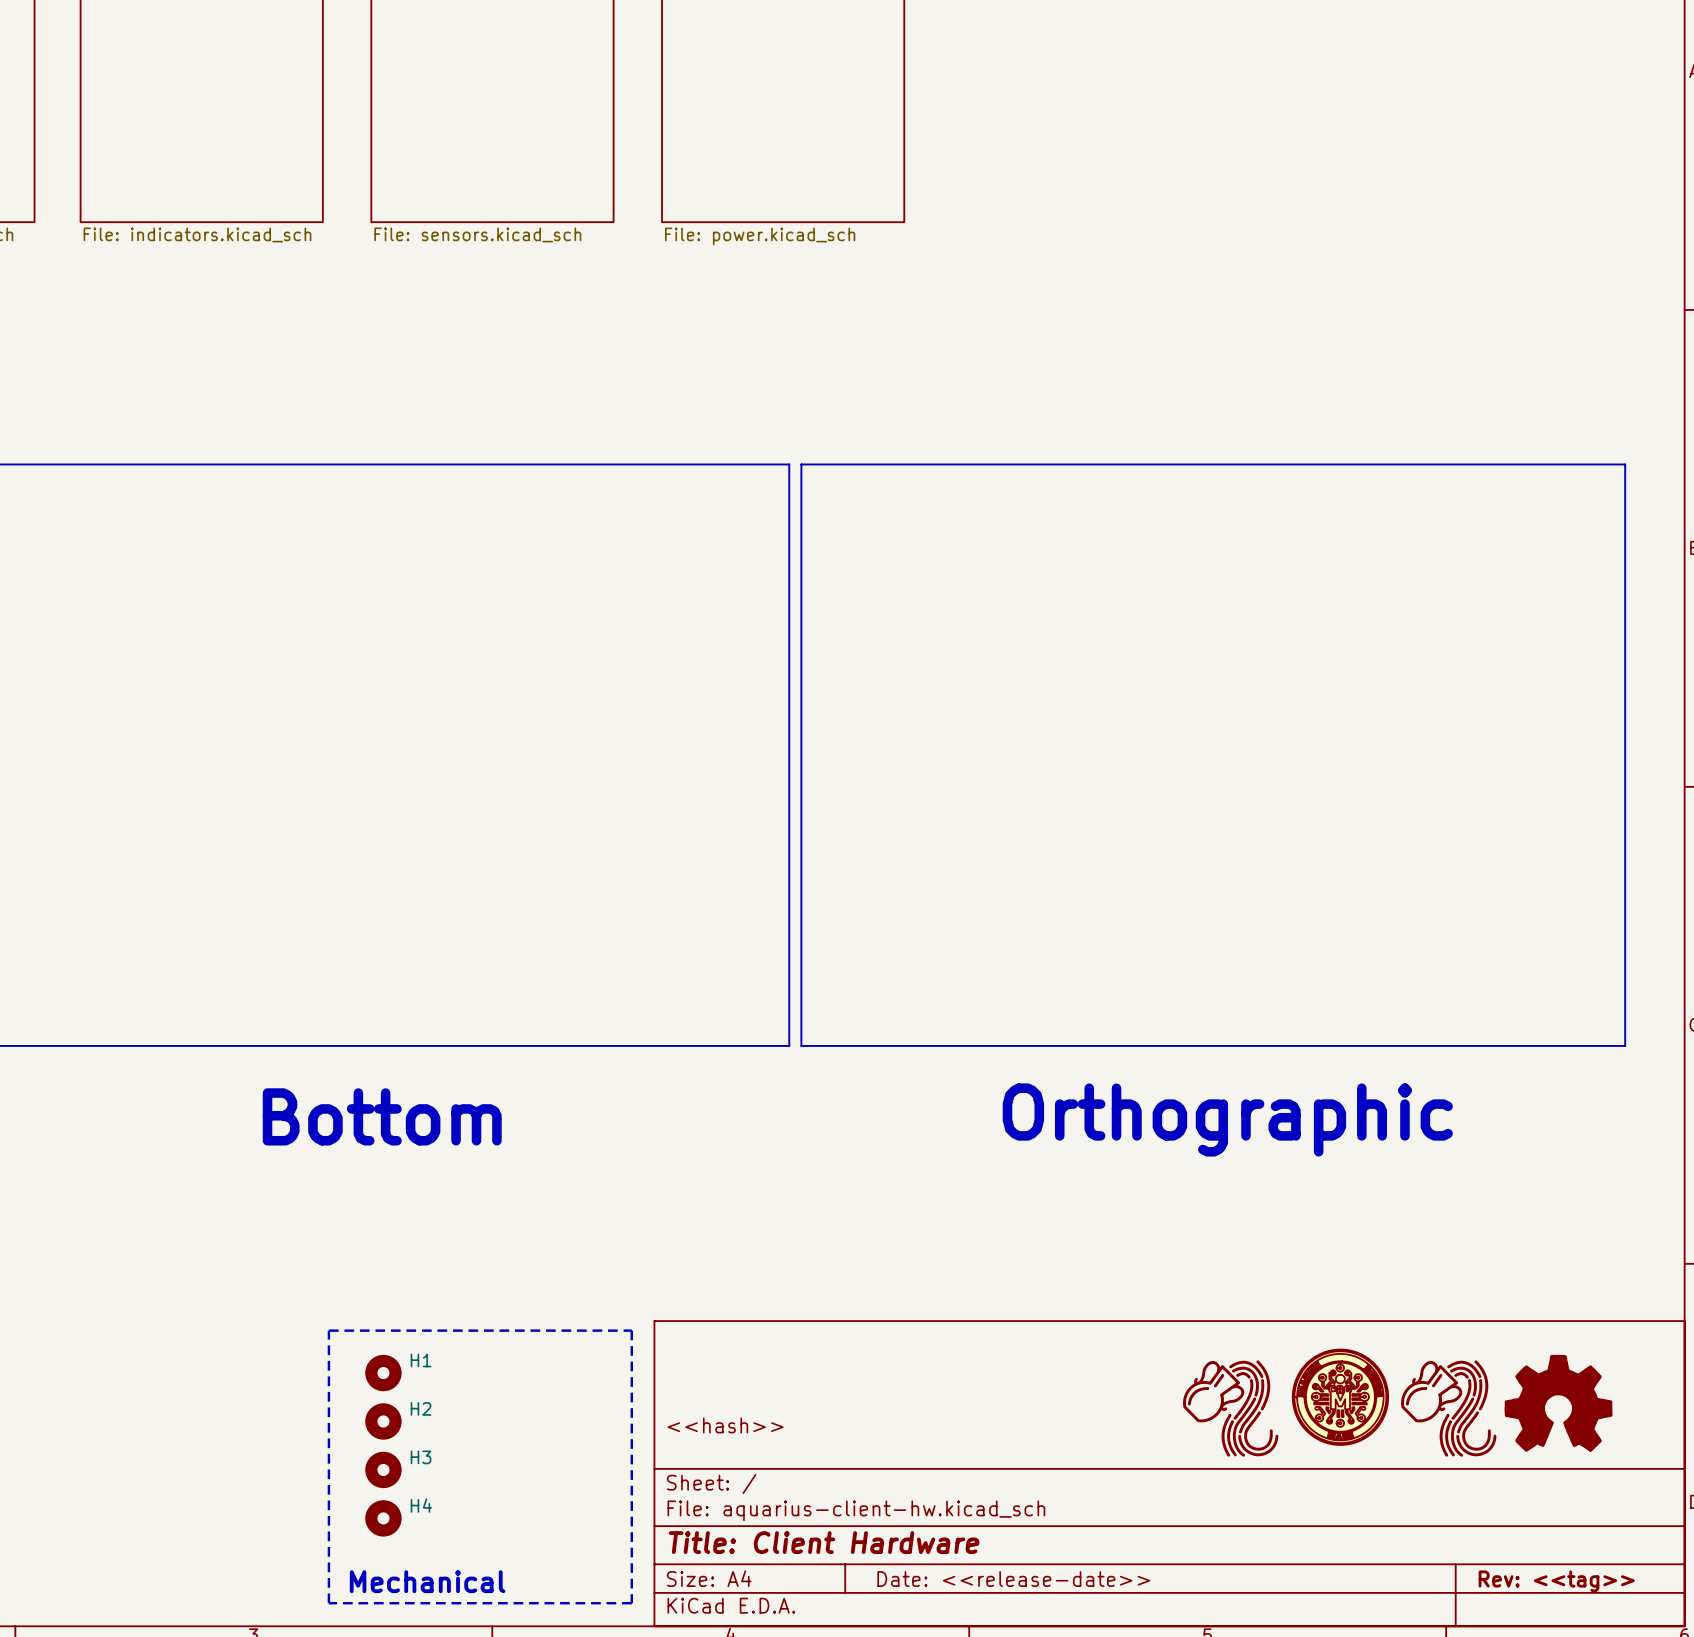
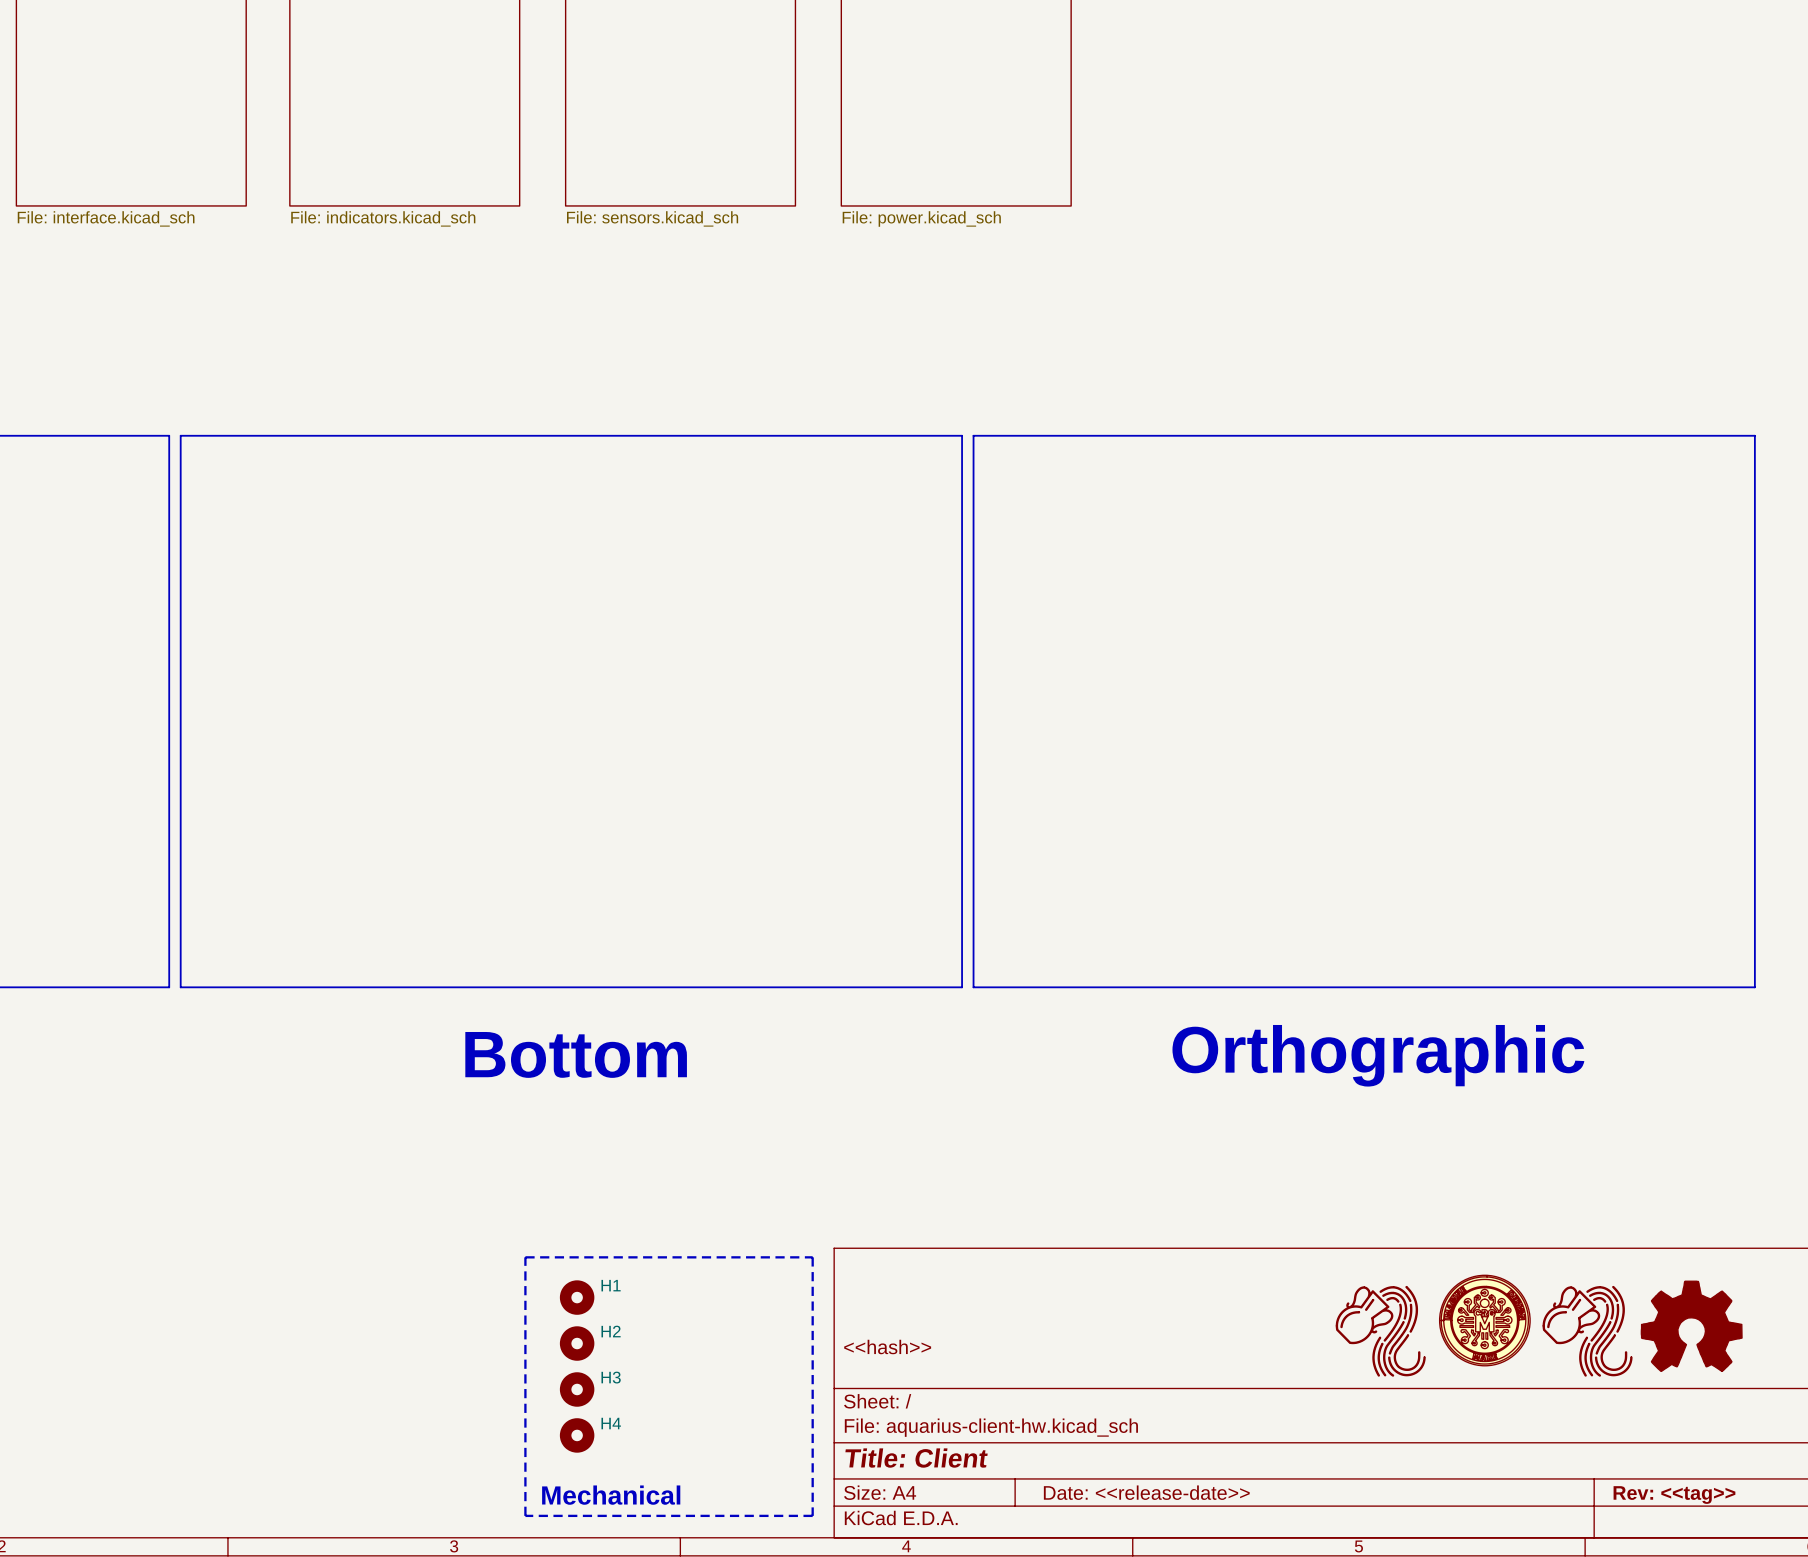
title block: Title: Client Hardware (824, 1542) -> Title: Client (916, 1458)

